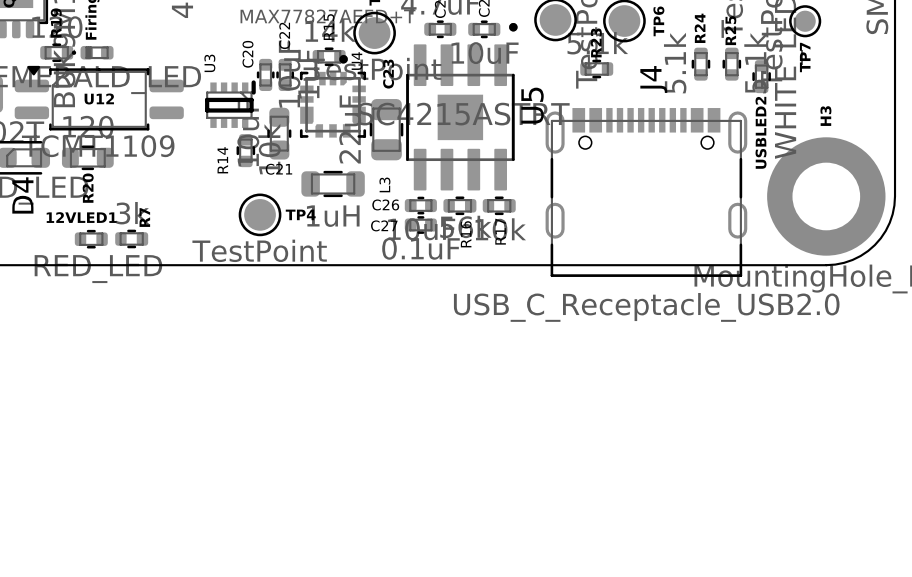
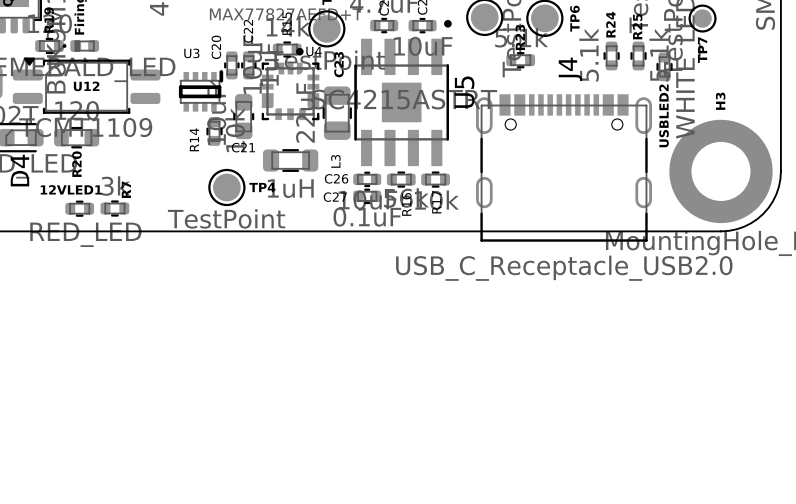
U4 name rotation: 0° (357, 61) -> 90° clockwise (314, 51)
U3 name rotation: 0° (209, 63) -> 90° clockwise (191, 53)

